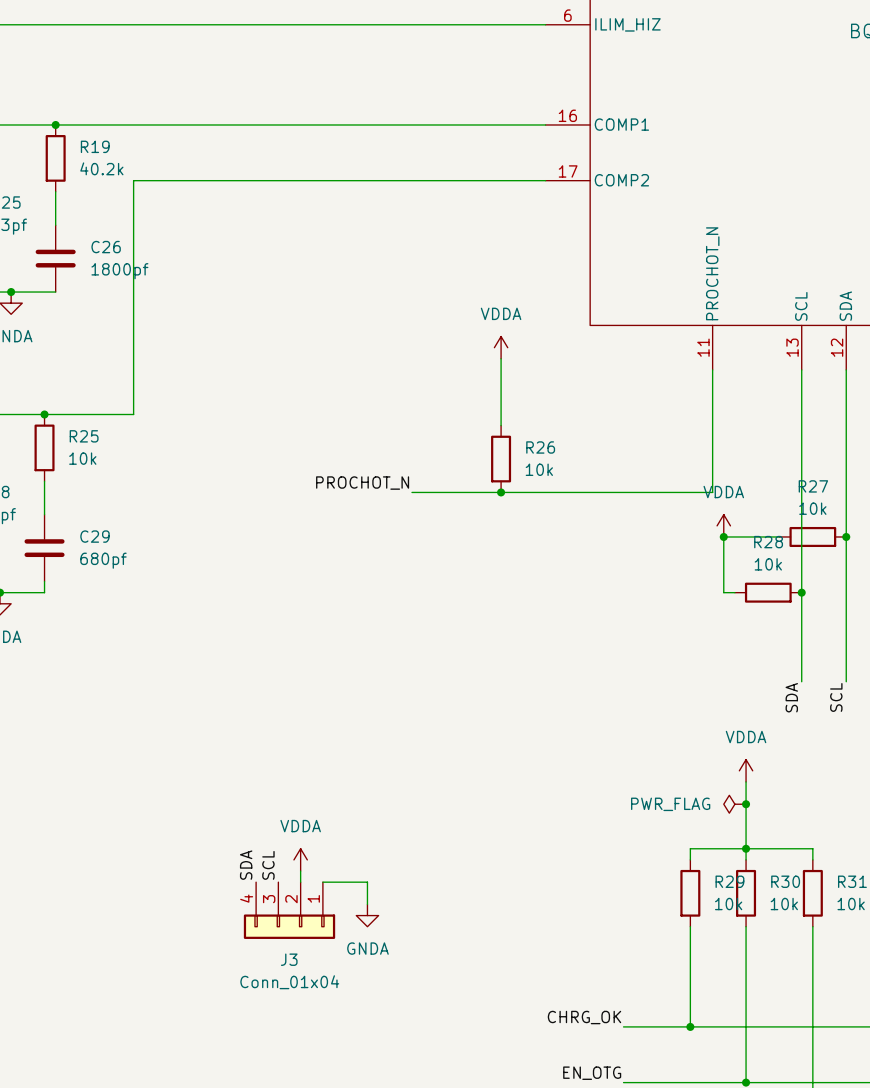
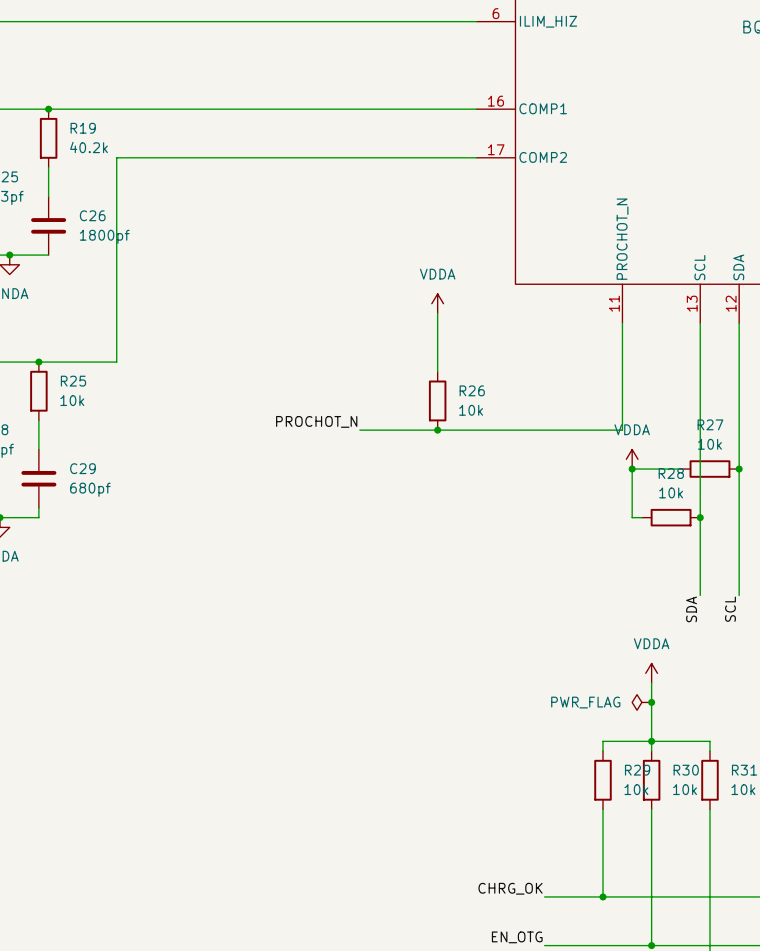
power symbol: VDDA (300, 859) -> none
label: SDA (246, 865) -> none
label: SCL (268, 865) -> none
wire: (300, 871) (300, 882) -> none
wire: (322, 882) (367, 882) (367, 904) -> none
J3: Conn_01x04 (289, 910) -> none
power symbol: GNDA (367, 915) -> none

